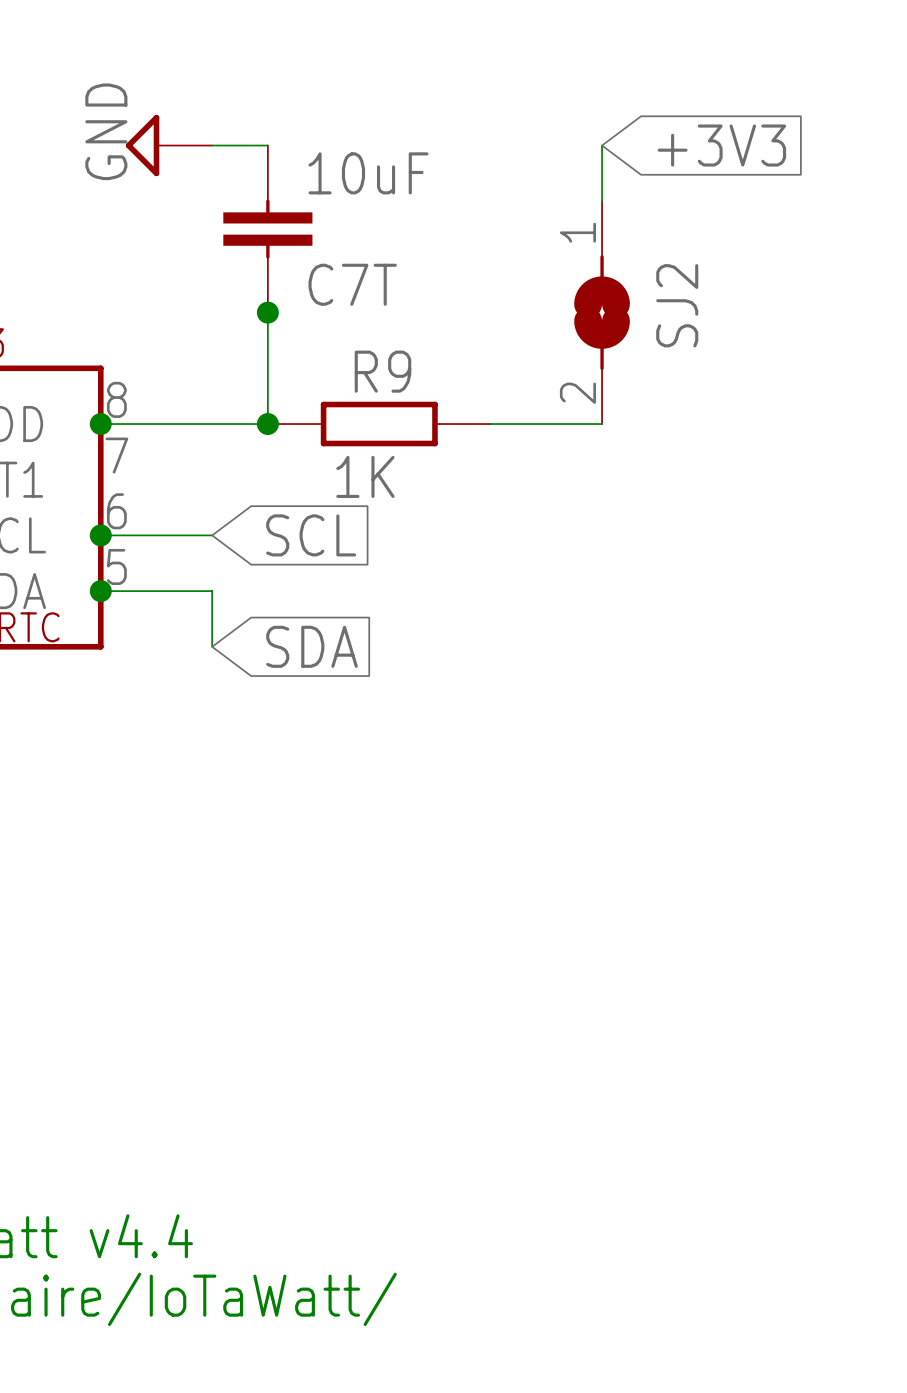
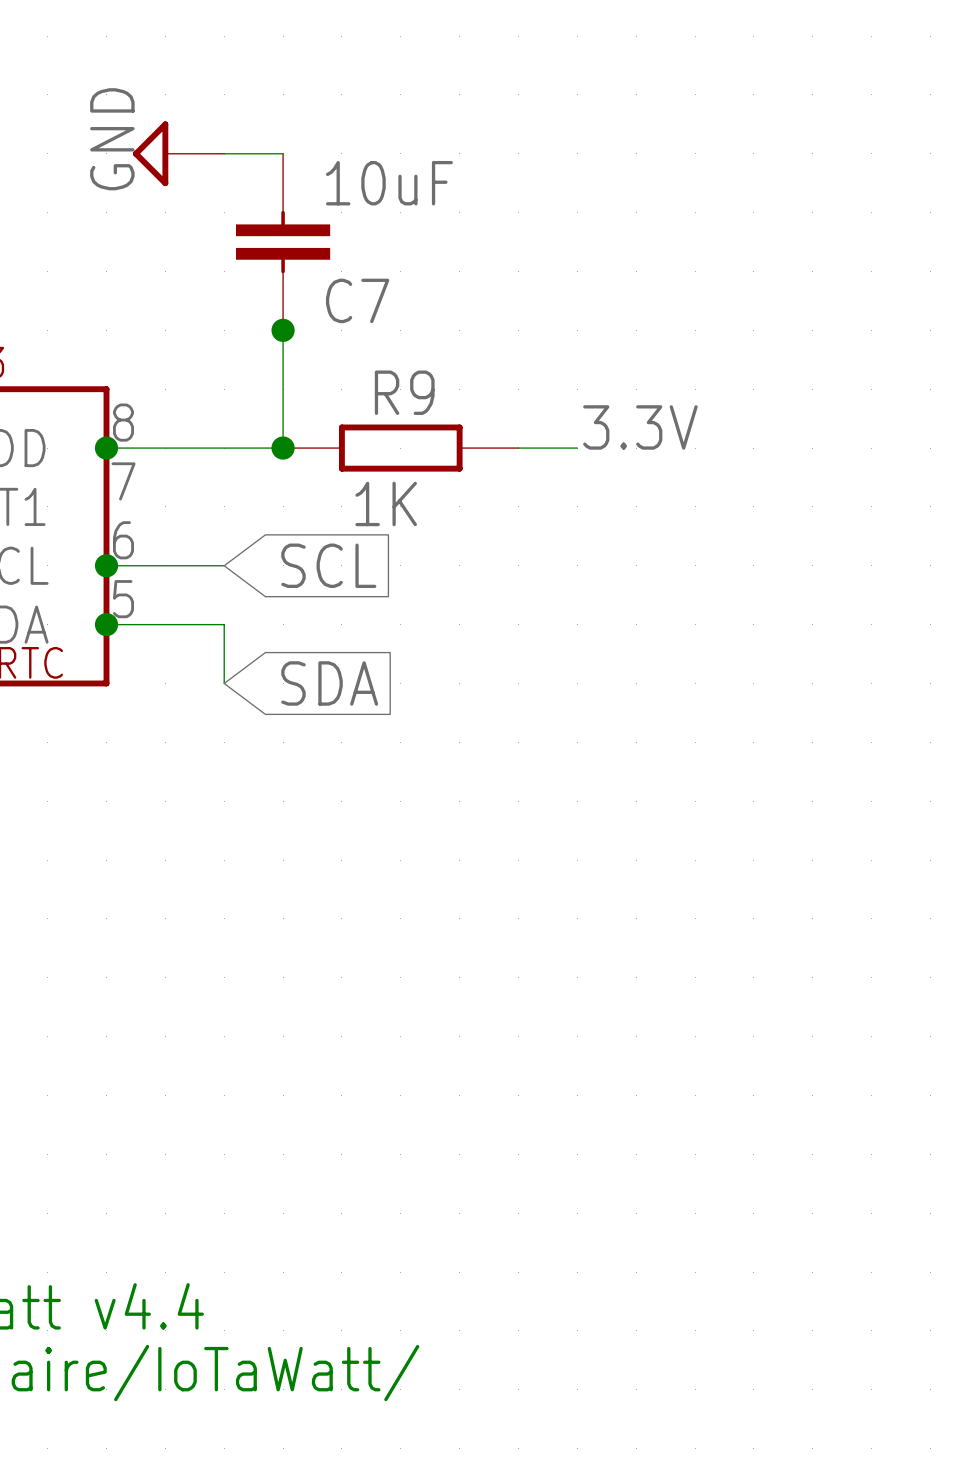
wire: (602, 145) (602, 201) -> none
global label: +3V3 (721, 145) -> none
C7T name: C7T (352, 284) -> C7 (357, 300)
SJ2: (602, 312) -> none
label: none -> 3.3V (640, 427)
wire: (546, 424) (602, 424) -> none

